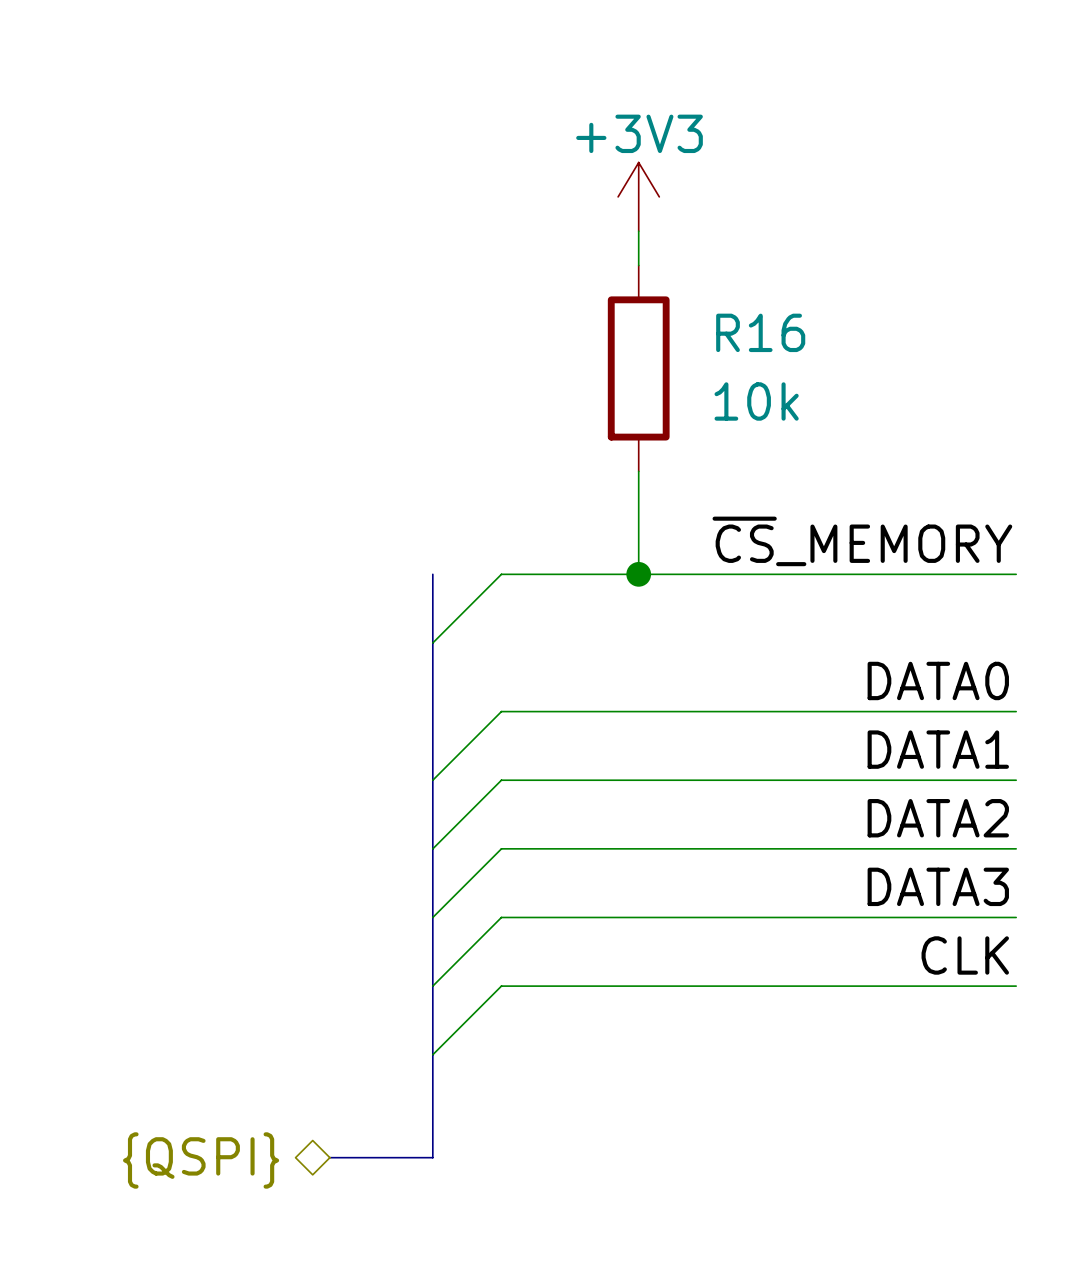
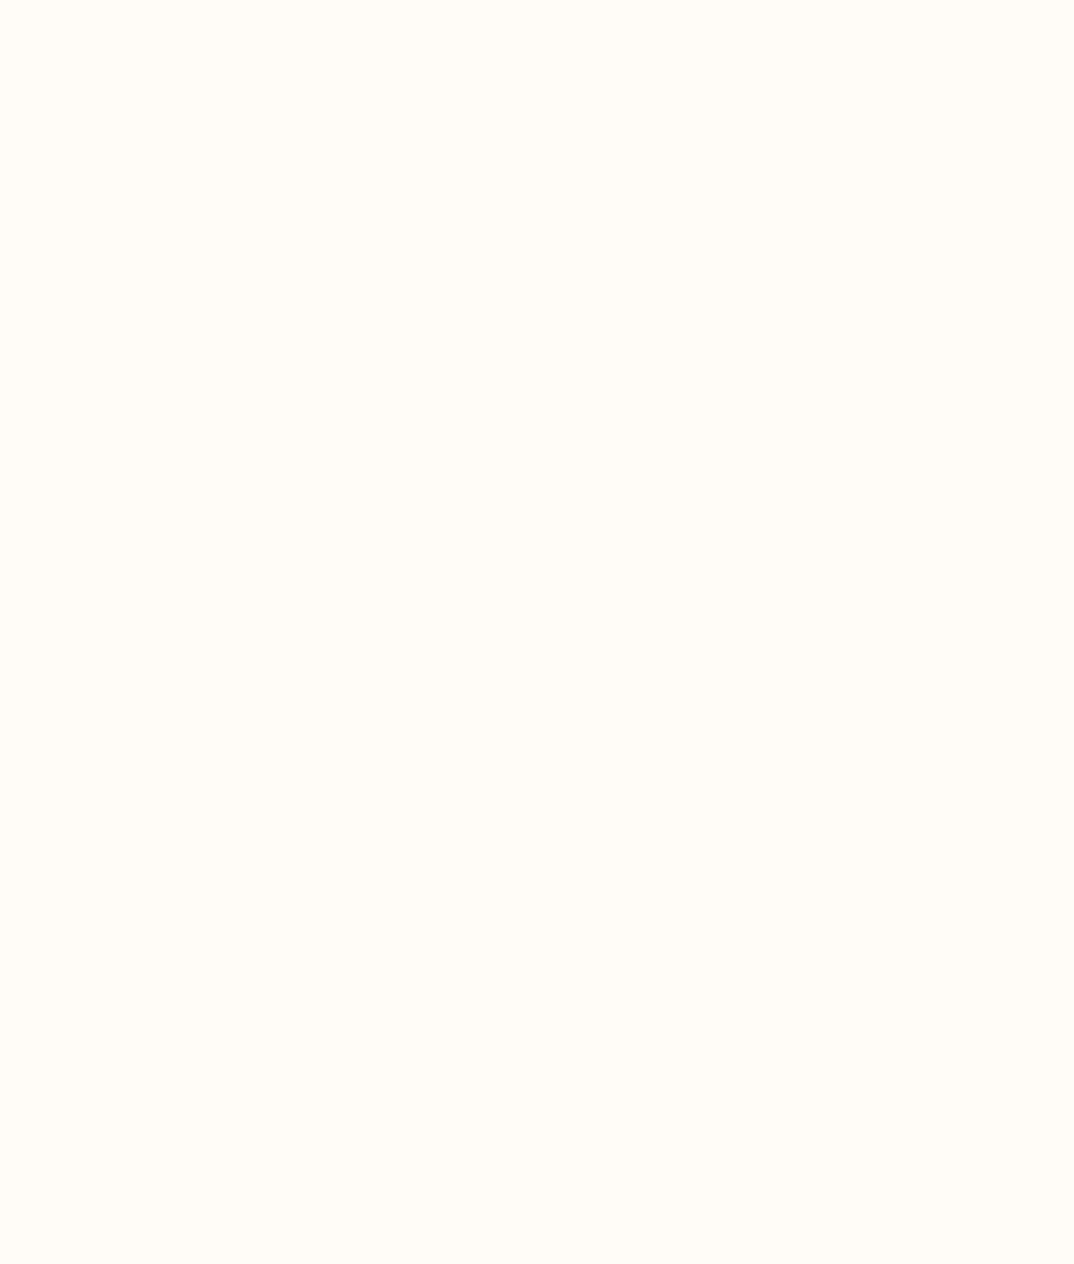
power symbol: +3V3 (638, 196) -> none
wire: (638, 231) (638, 265) -> none
R16: (638, 368) -> none
wire: (638, 471) (638, 574) -> none
label: ~{CS}_MEMORY (862, 541) -> none
bus: (432, 574) (432, 1157) (329, 1157) -> none
junction: (638, 574) -> none
wire: (1016, 574) (501, 574) (432, 642) -> none
label: DATA0 (938, 680) -> none
wire: (1016, 711) (501, 711) (432, 780) -> none
label: DATA1 (938, 749) -> none
wire: (1016, 780) (501, 780) (432, 848) -> none
label: DATA2 (938, 818) -> none
wire: (1016, 848) (501, 848) (432, 917) -> none
label: DATA3 (938, 886) -> none
wire: (1016, 917) (501, 917) (432, 986) -> none
label: CLK (965, 955) -> none
wire: (1016, 986) (501, 986) (432, 1054) -> none
hierarchical label: {QSPI} (201, 1160) -> none

